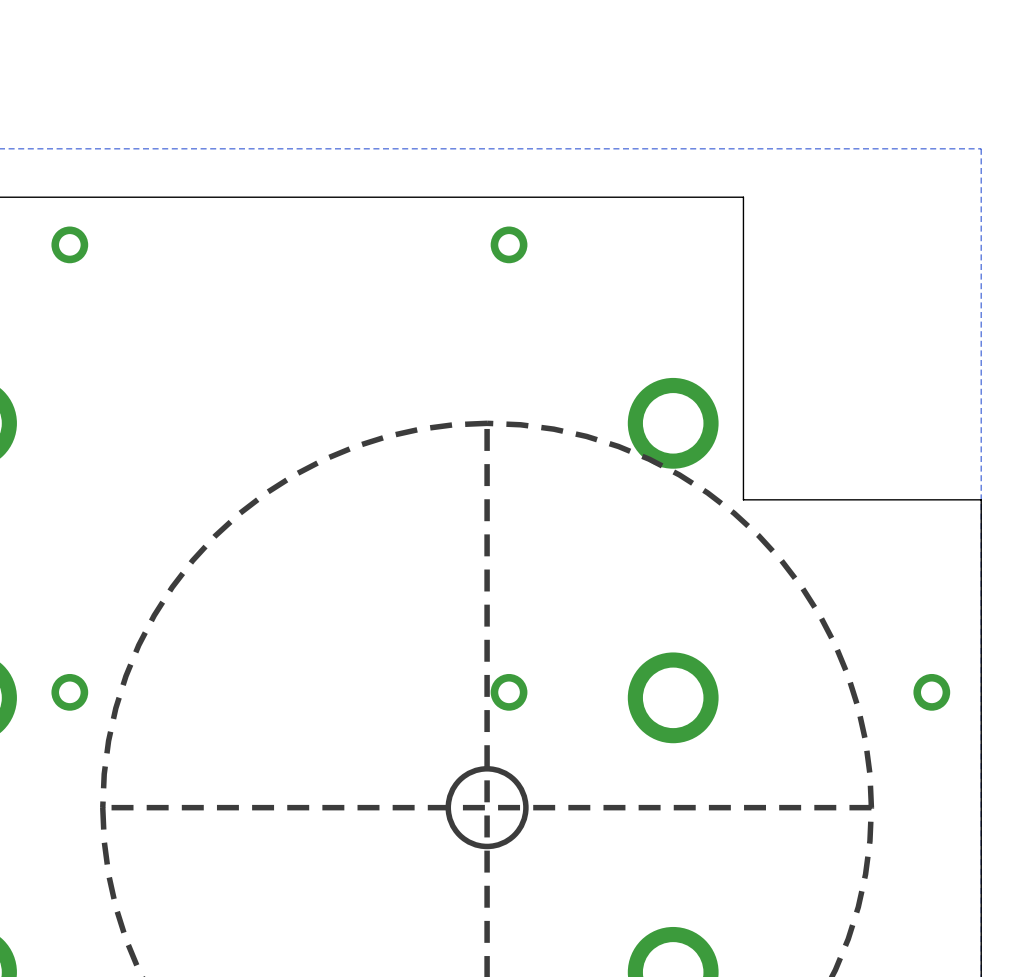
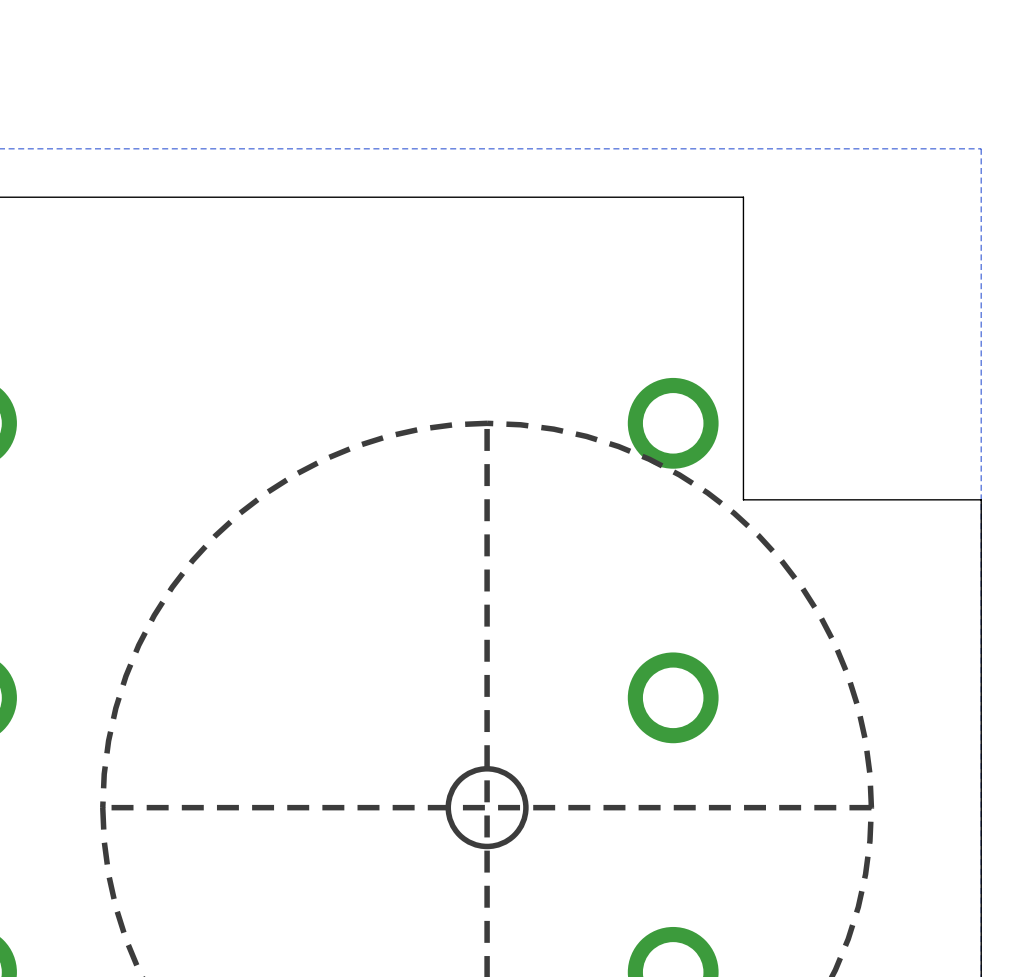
via: (69, 244) -> none
via: (509, 244) -> none
via: (69, 692) -> none
via: (509, 692) -> none
via: (931, 692) -> none

